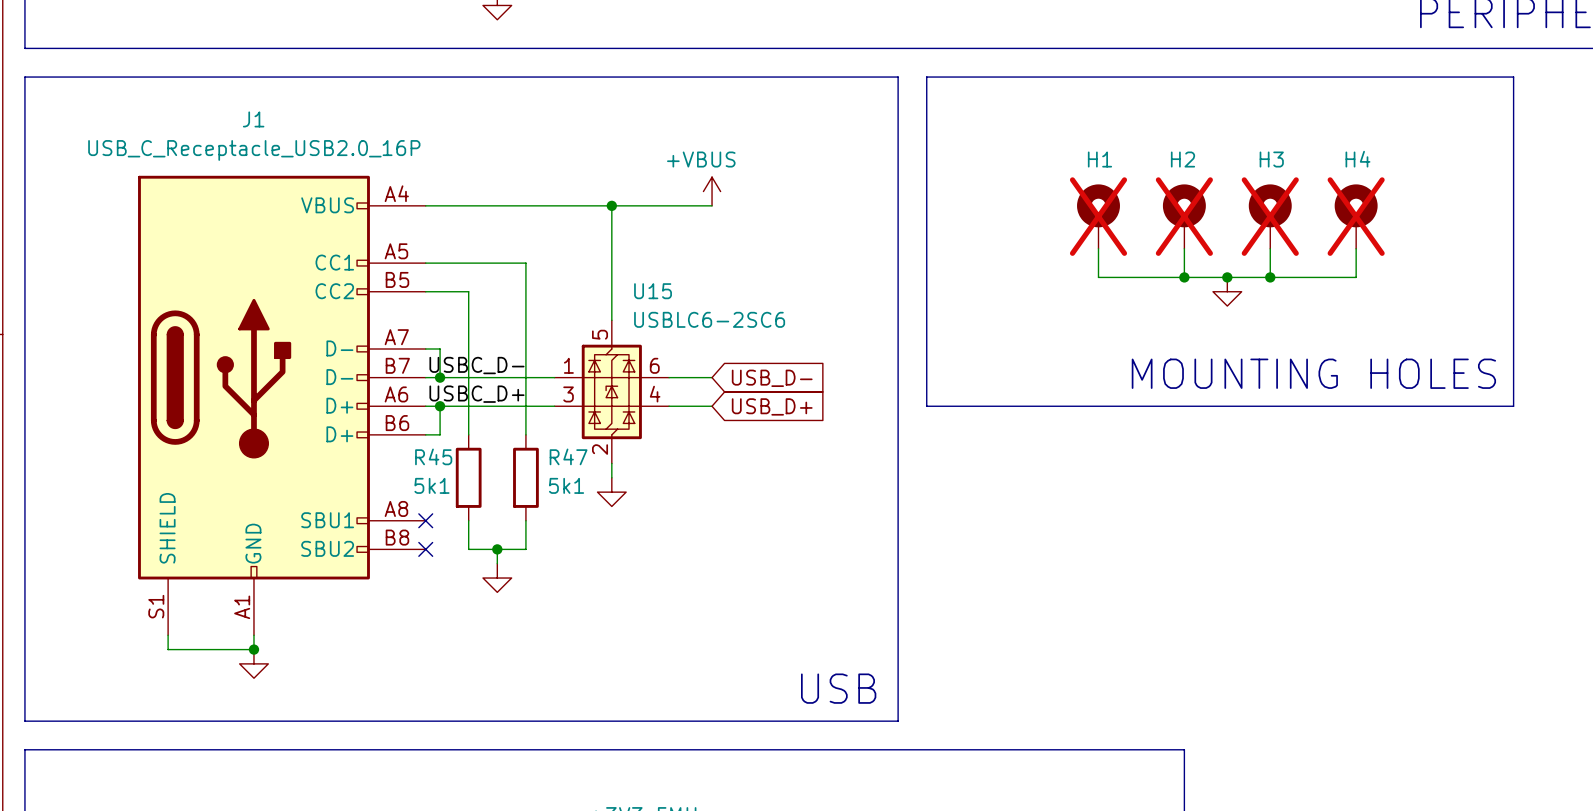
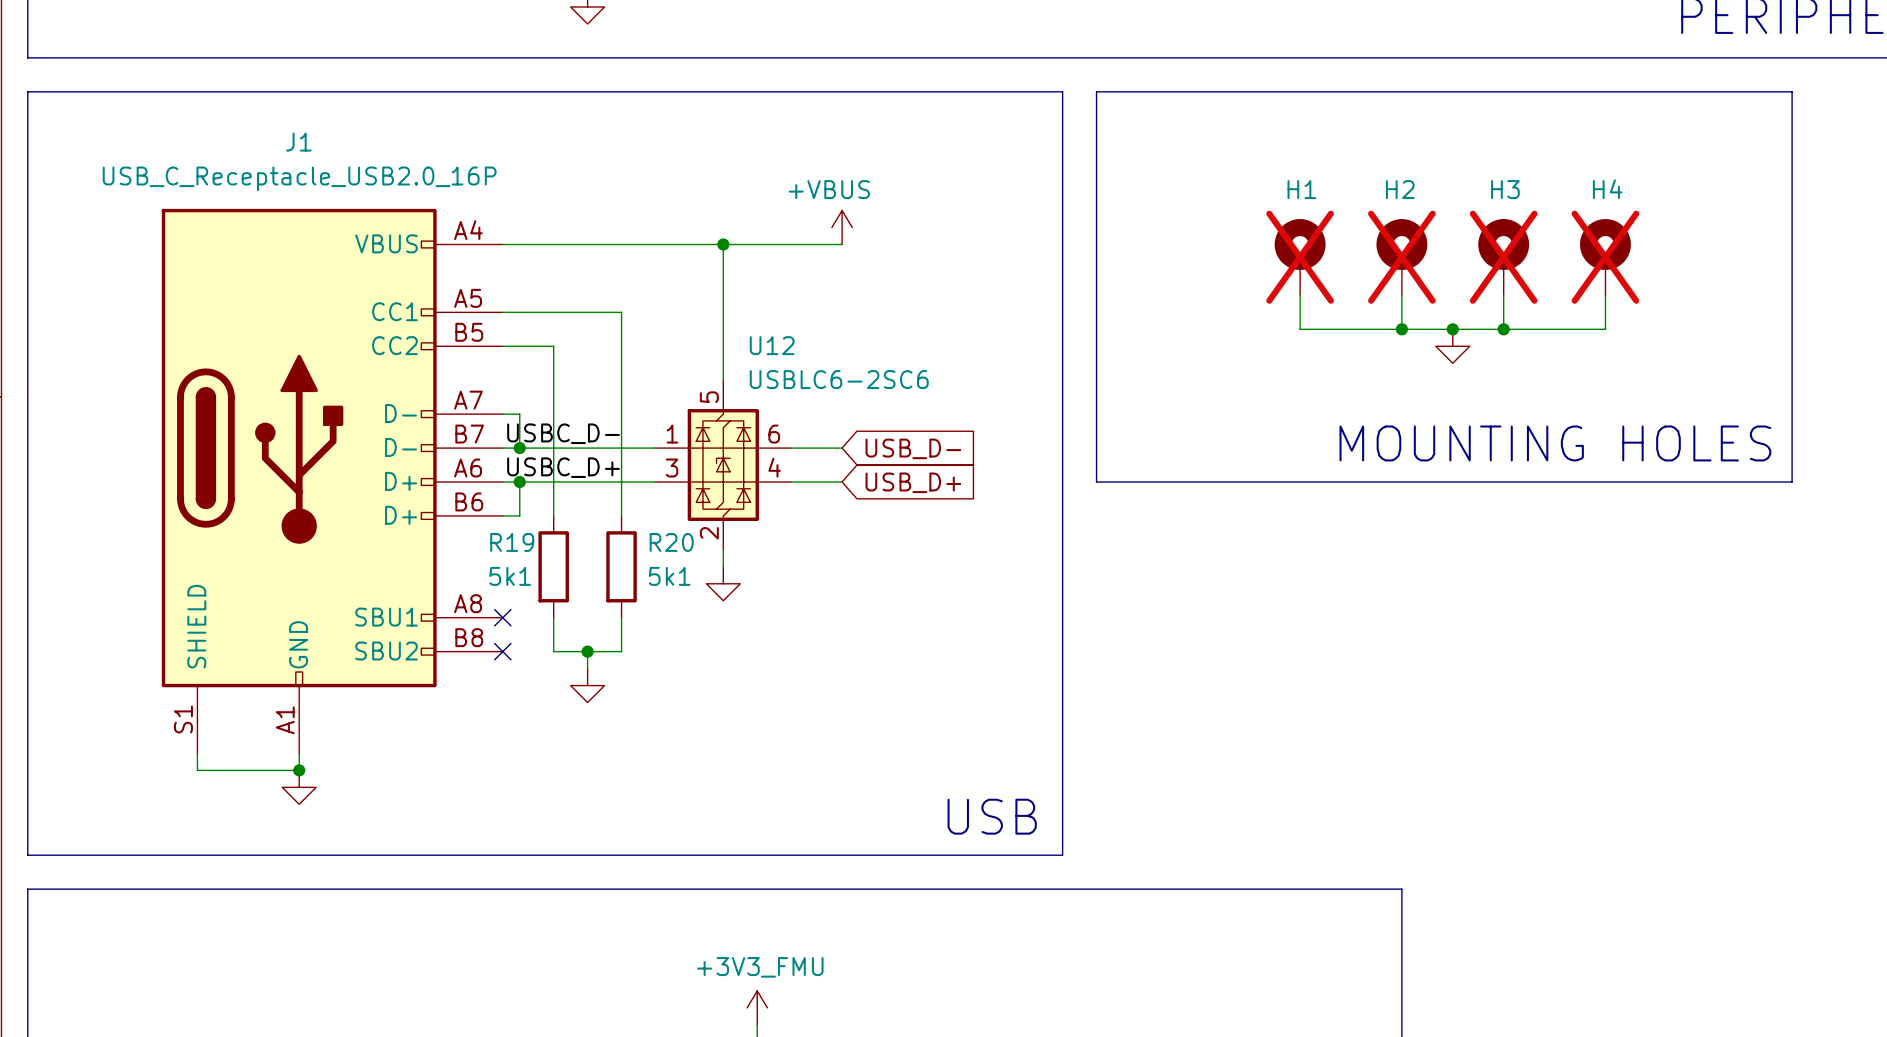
U15 name: U15 (653, 291) -> U12 (772, 345)
R45 name: R45 (433, 456) -> R19 (512, 542)
R47 name: R47 (568, 456) -> R20 (671, 542)

